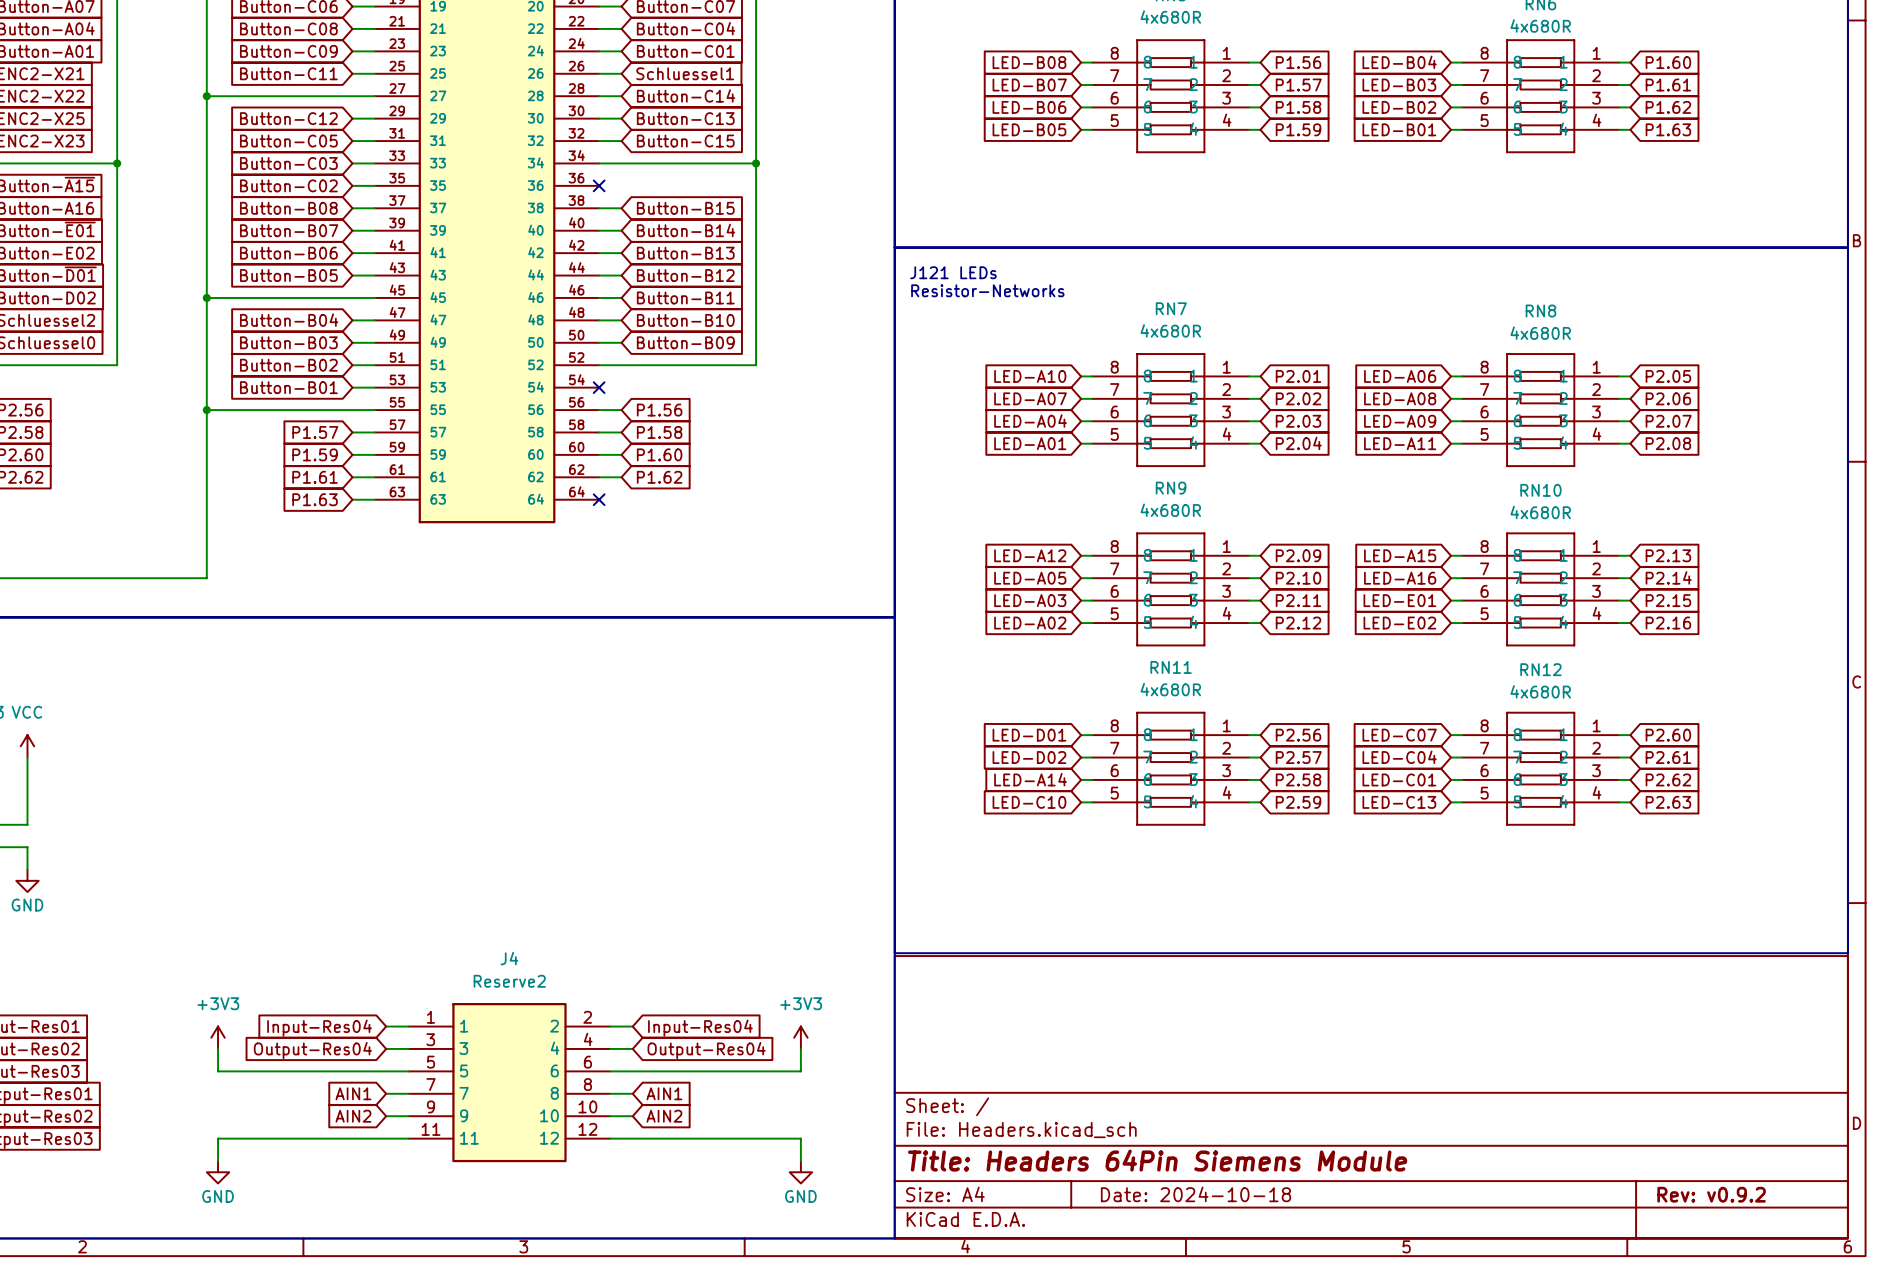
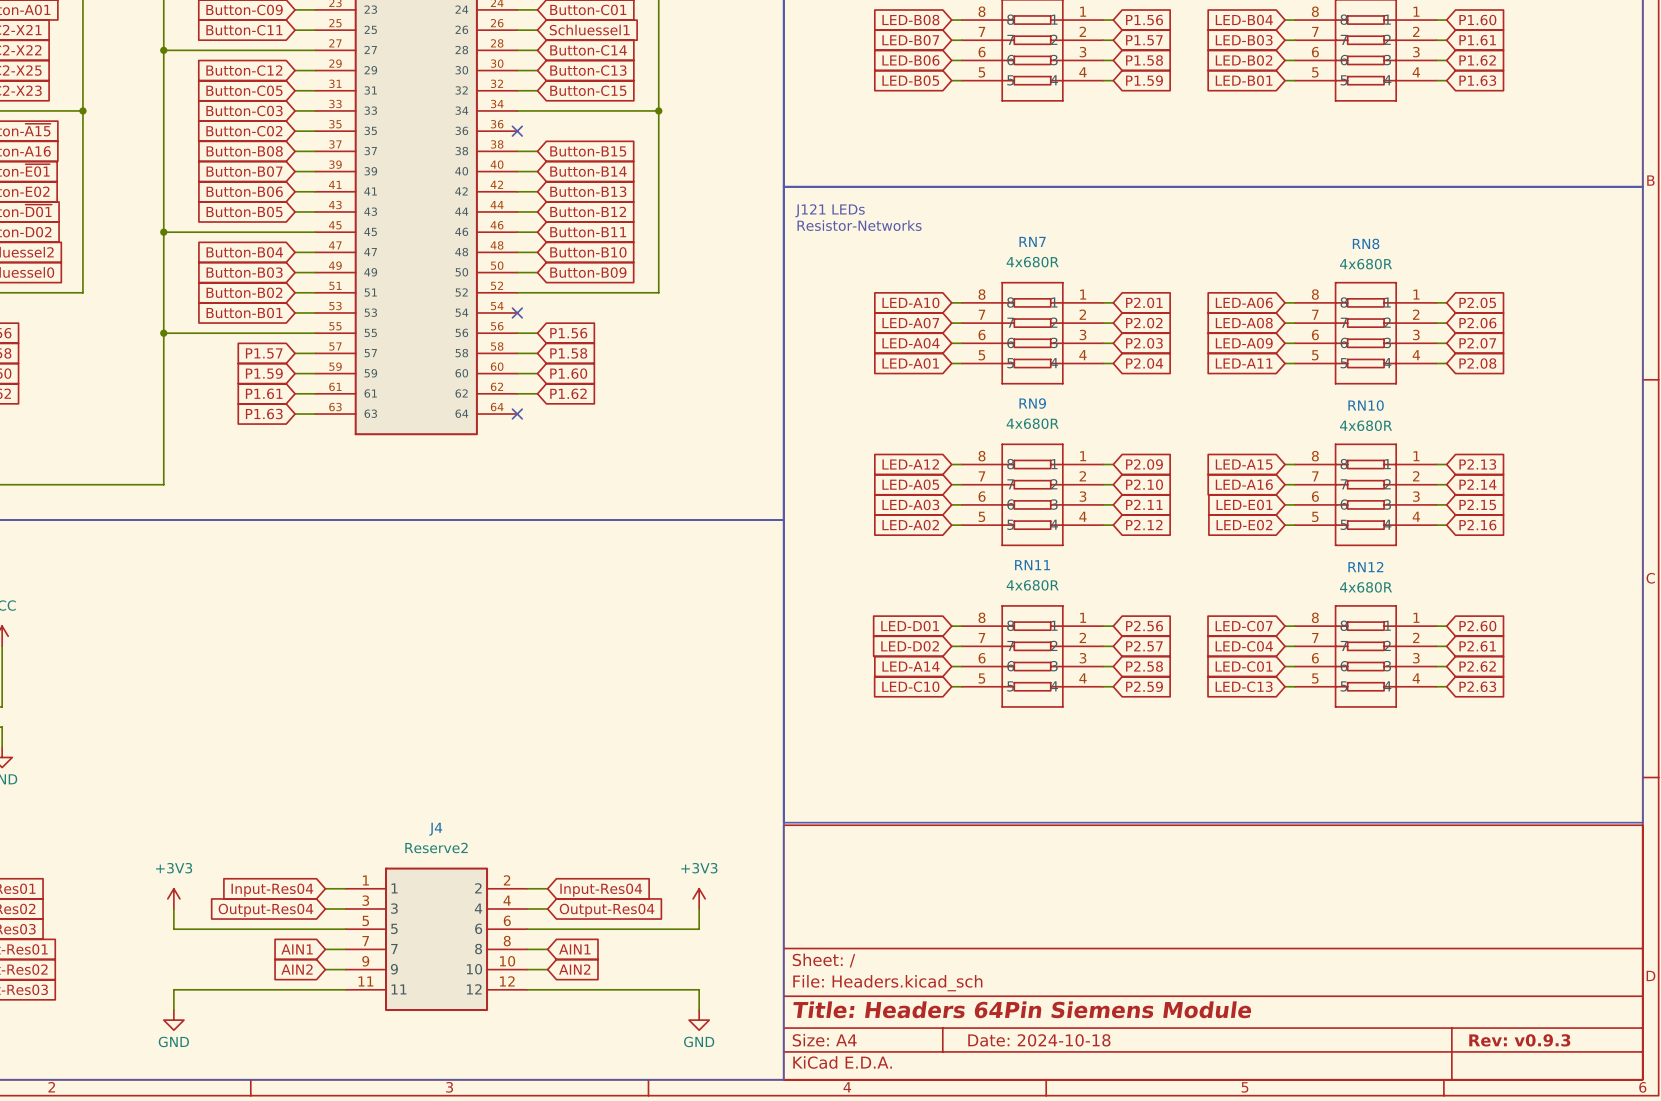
title block: Rev: v0.9.2 (1711, 1194) -> Rev: v0.9.3 (1519, 1040)

